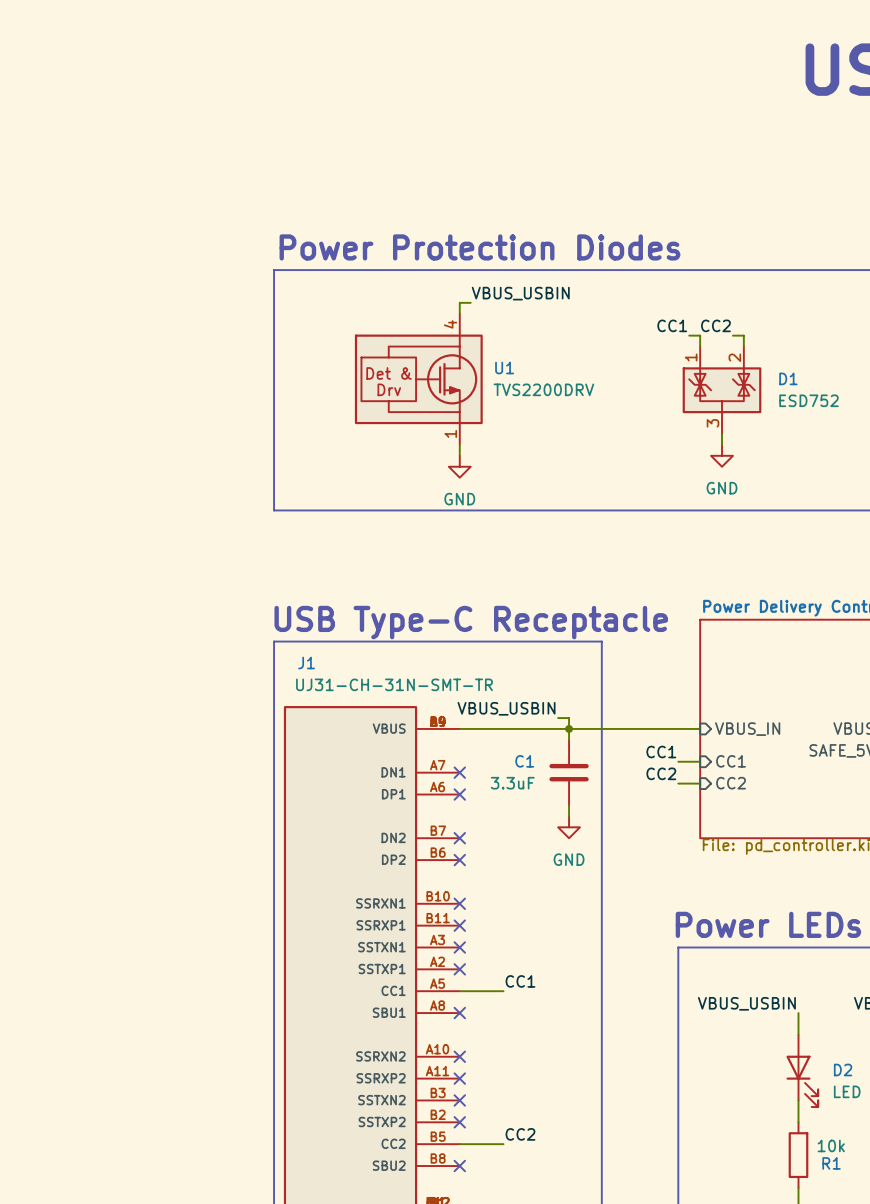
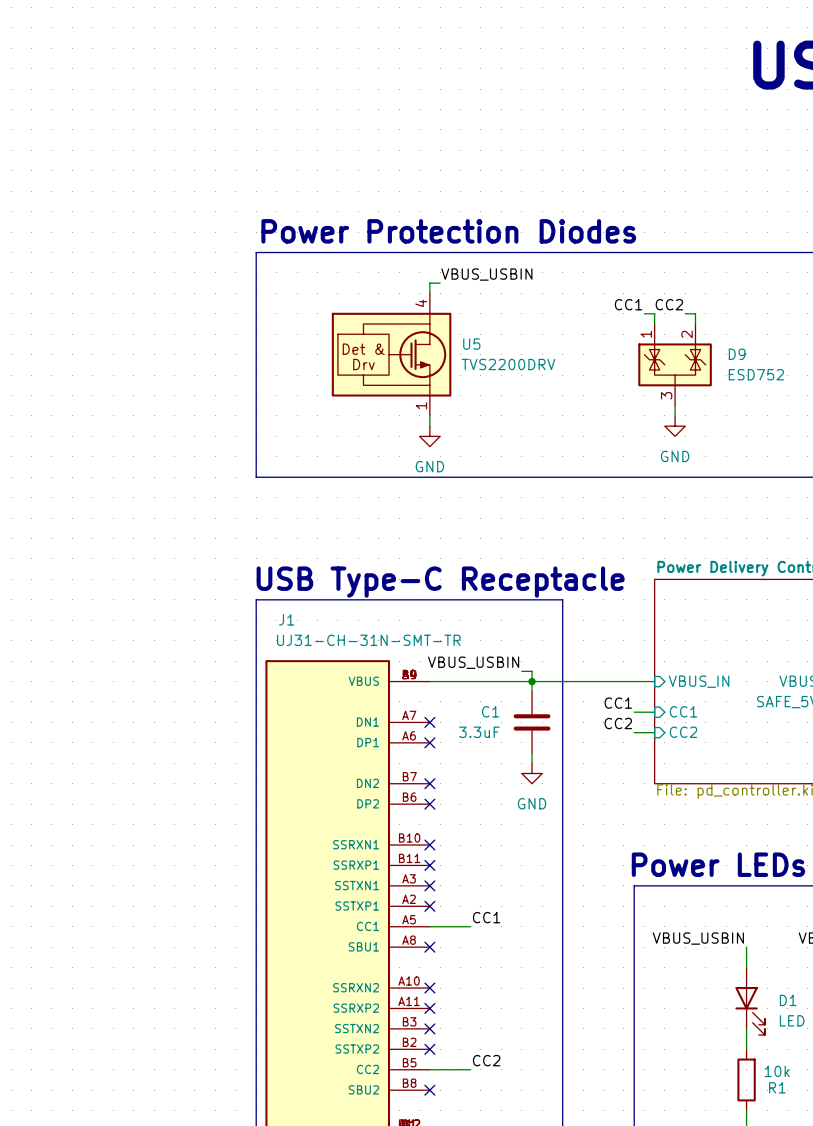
U1 name: U1 (504, 368) -> U5 (471, 344)
D1 name: D1 (788, 378) -> D9 (737, 354)
D2 name: D2 (843, 1070) -> D1 (788, 1000)

